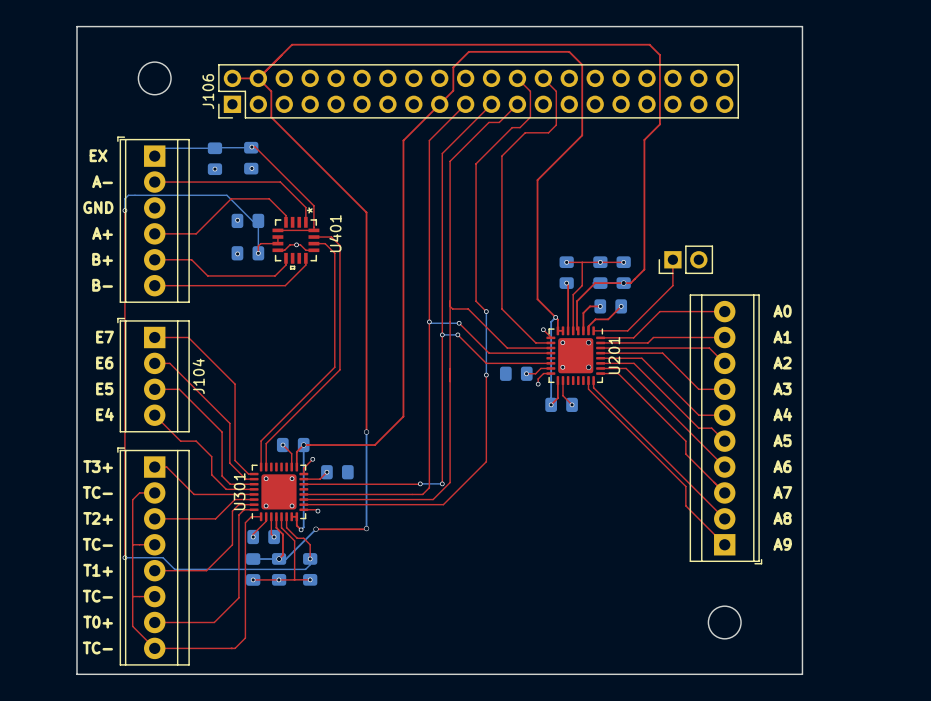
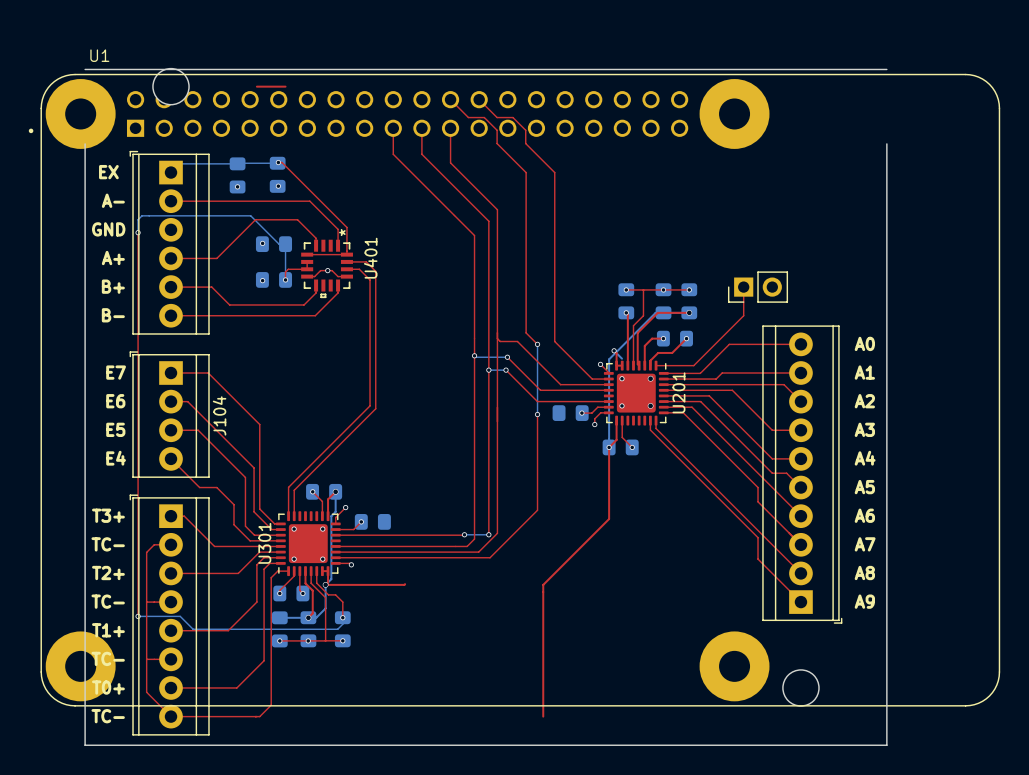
board edge: none -> (85, 69) (886, 69)
top track: (517, 78) (530, 91) (530, 117) (520, 127) (512, 127) (476, 163) -> (450, 99) (468, 117) (484, 117) (497, 130) (497, 143) (526, 172) (526, 181)
top track: (543, 78) (556, 91) (556, 125) (548, 132) (525, 132) (501, 156) -> (479, 99) (497, 117) (512, 117) (525, 130) (525, 143) (554, 172)
J106: (478, 91) -> none
top track: (465, 104) (429, 140) (429, 213) -> (393, 128) (393, 154) (474, 235)
top track: (491, 104) (442, 153) (442, 200) -> (421, 128) (421, 154) (488, 221)
top track: (517, 104) (499, 122) (488, 122) (450, 161) (450, 189) -> (450, 128) (450, 162) (497, 209)
board edge: (76, 130) (76, 26) (802, 26) (802, 130) -> none
top track: (634, 279) (644, 269) (644, 139) (659, 124) (659, 55) (649, 44) (292, 44) (258, 78) (271, 91) (271, 117) (366, 212) (366, 432) -> none
top track: (634, 279) (630, 283) (623, 283) -> none
bottom track: (555, 317) (551, 321) (551, 325) -> (655, 312) (609, 359)
top track: (557, 319) (537, 299) (537, 180) (582, 135) (582, 64) (569, 51) (468, 51) (453, 67) (453, 90) (403, 140) (403, 416) (374, 445) (303, 445) -> none
bottom track: none -> (615, 352) (621, 358)
U1: none -> (514, 390)
top track: none -> (609, 447) (609, 519) (543, 584) (543, 716)
bottom track: (366, 432) (366, 528) -> none
via: (366, 432) -> none
bottom track: (303, 463) (303, 527) (301, 529) -> (335, 511) (331, 516) (331, 579) (325, 584) (325, 608)
top track: (296, 525) (301, 529) -> (328, 580) (325, 584) (349, 584)
via: (366, 528) -> none
via: (301, 529) -> none
bottom track: (316, 529) (294, 550) -> none
via position: (316, 529) -> (325, 584)

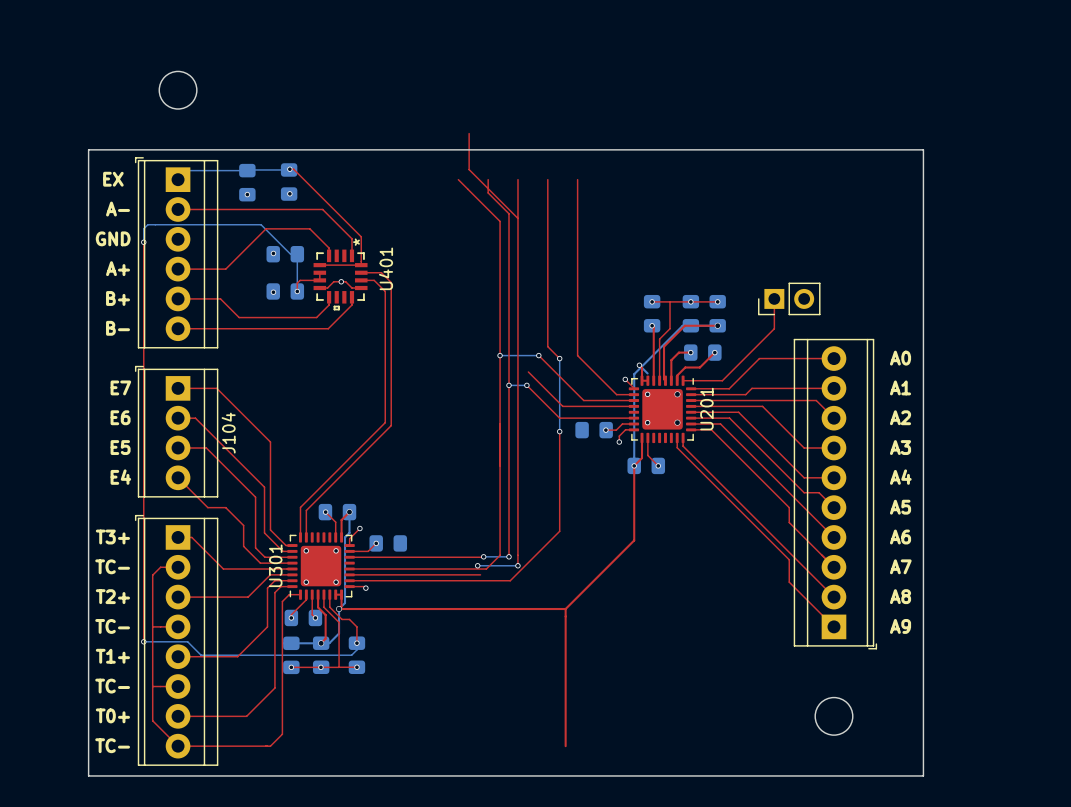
board edge: (85, 69) (886, 69) -> (88, 149) (923, 149)
top track: (256, 86) (285, 86) -> none
top track: (450, 99) (468, 117) (484, 117) (497, 130) (497, 143) (526, 172) -> none
top track: (479, 99) (497, 117) (512, 117) (525, 130) (525, 143) (554, 172) -> none
top track: (393, 128) (393, 154) (474, 235) (474, 539) -> (500, 221) (500, 555) (494, 561)
top track: (421, 128) (421, 154) (449, 181) -> (458, 179) (467, 189)
top track: none -> (517, 179) (517, 565)
top track: (497, 209) (497, 533) (478, 552) (461, 552) -> none
top track: (480, 212) (488, 221) -> (488, 179) (488, 192) (509, 213) (509, 230)
top track: (497, 338) (500, 341) (517, 341) -> none
bottom track: none -> (500, 355) (538, 355)
via: none -> (538, 355)
bottom track: (474, 355) (507, 357) -> none
via position: (474, 355) -> (500, 355)
via: (507, 357) -> none
U1: (514, 390) -> none
bottom track: none -> (477, 565) (517, 565)
via: none -> (477, 565)
via: none -> (517, 565)
top track: (405, 584) (404, 584) -> (565, 609) (421, 609)

